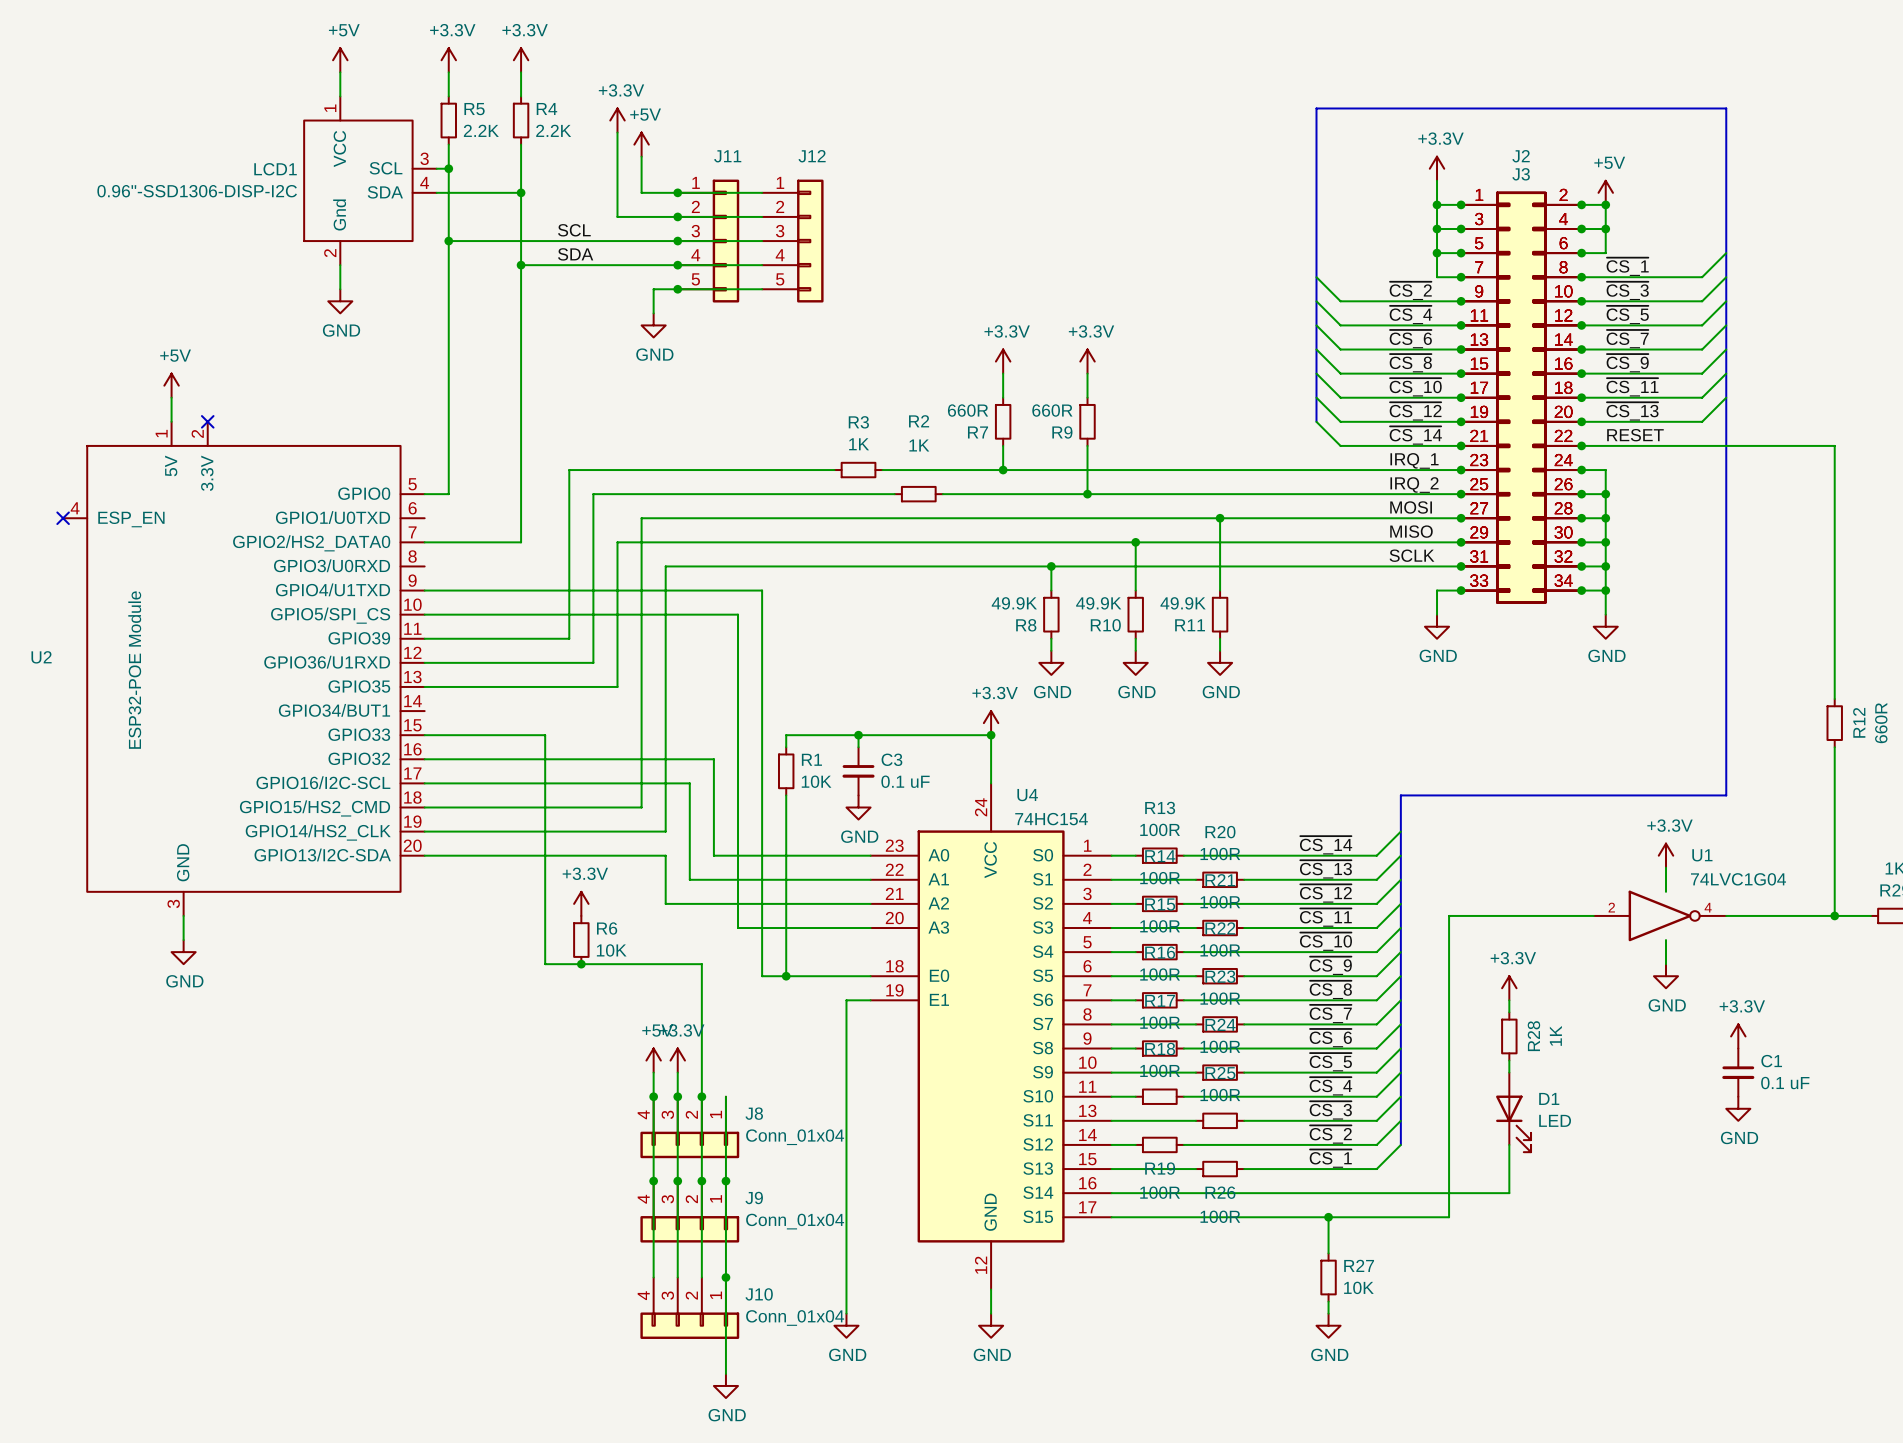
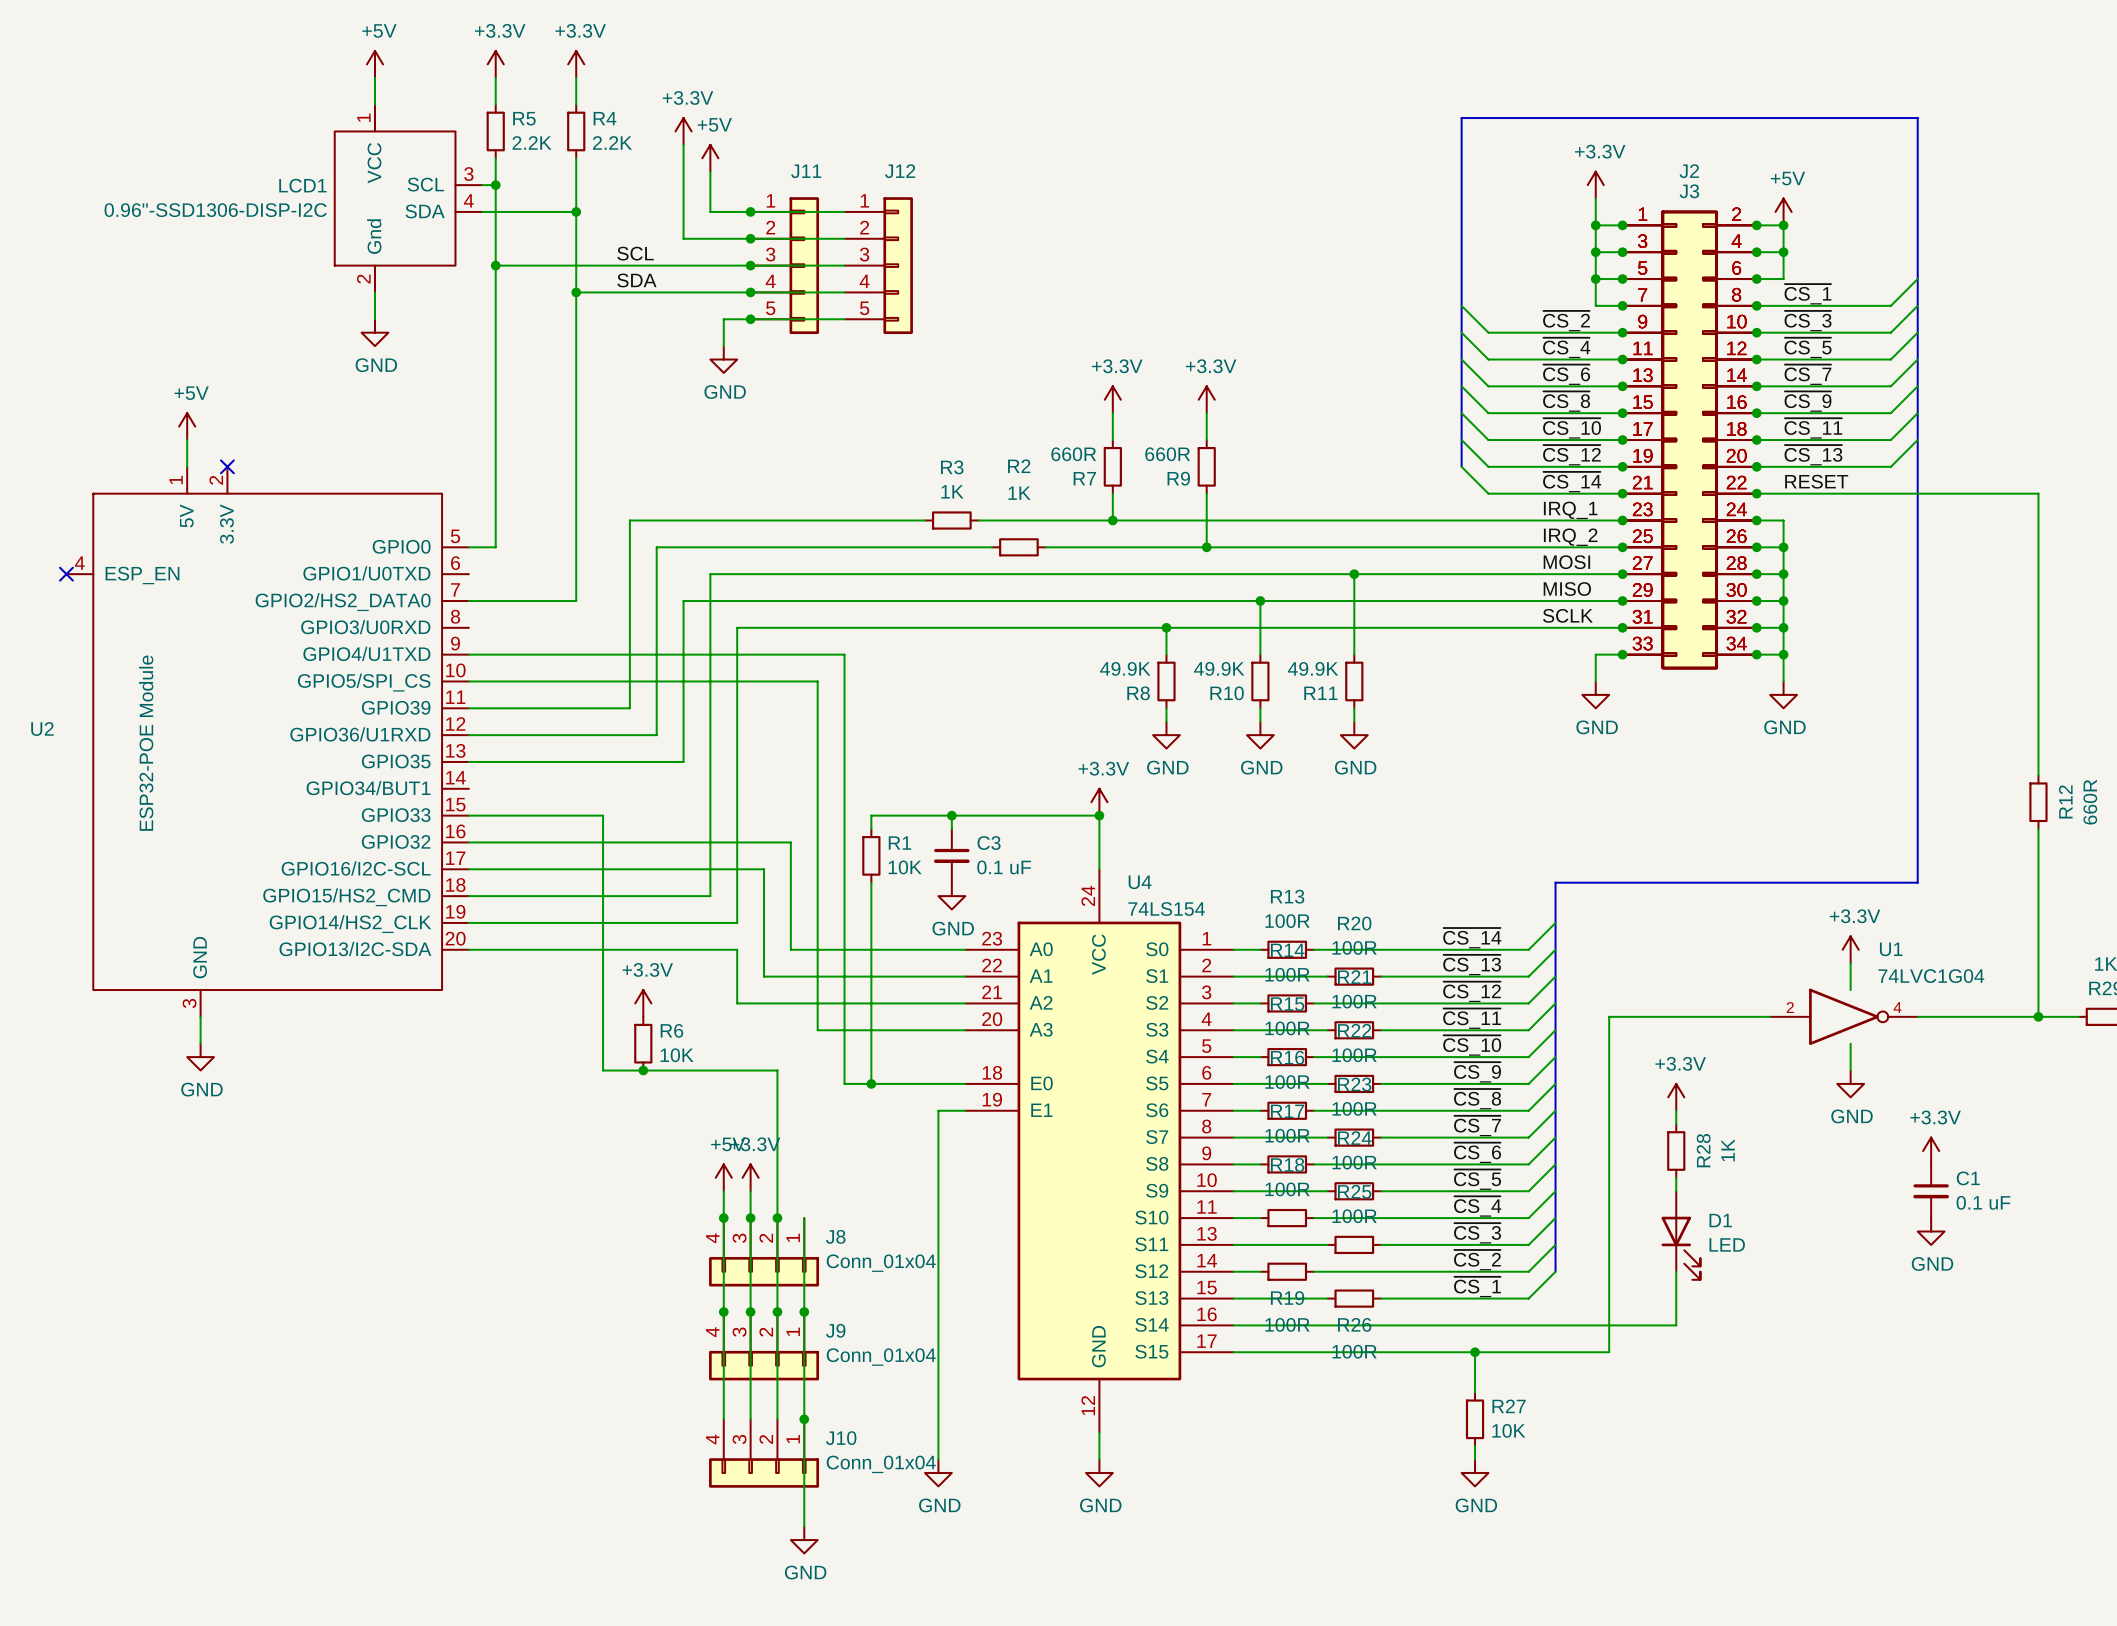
U4 value: 74HC154 (1051, 819) -> 74LS154 (1166, 909)

